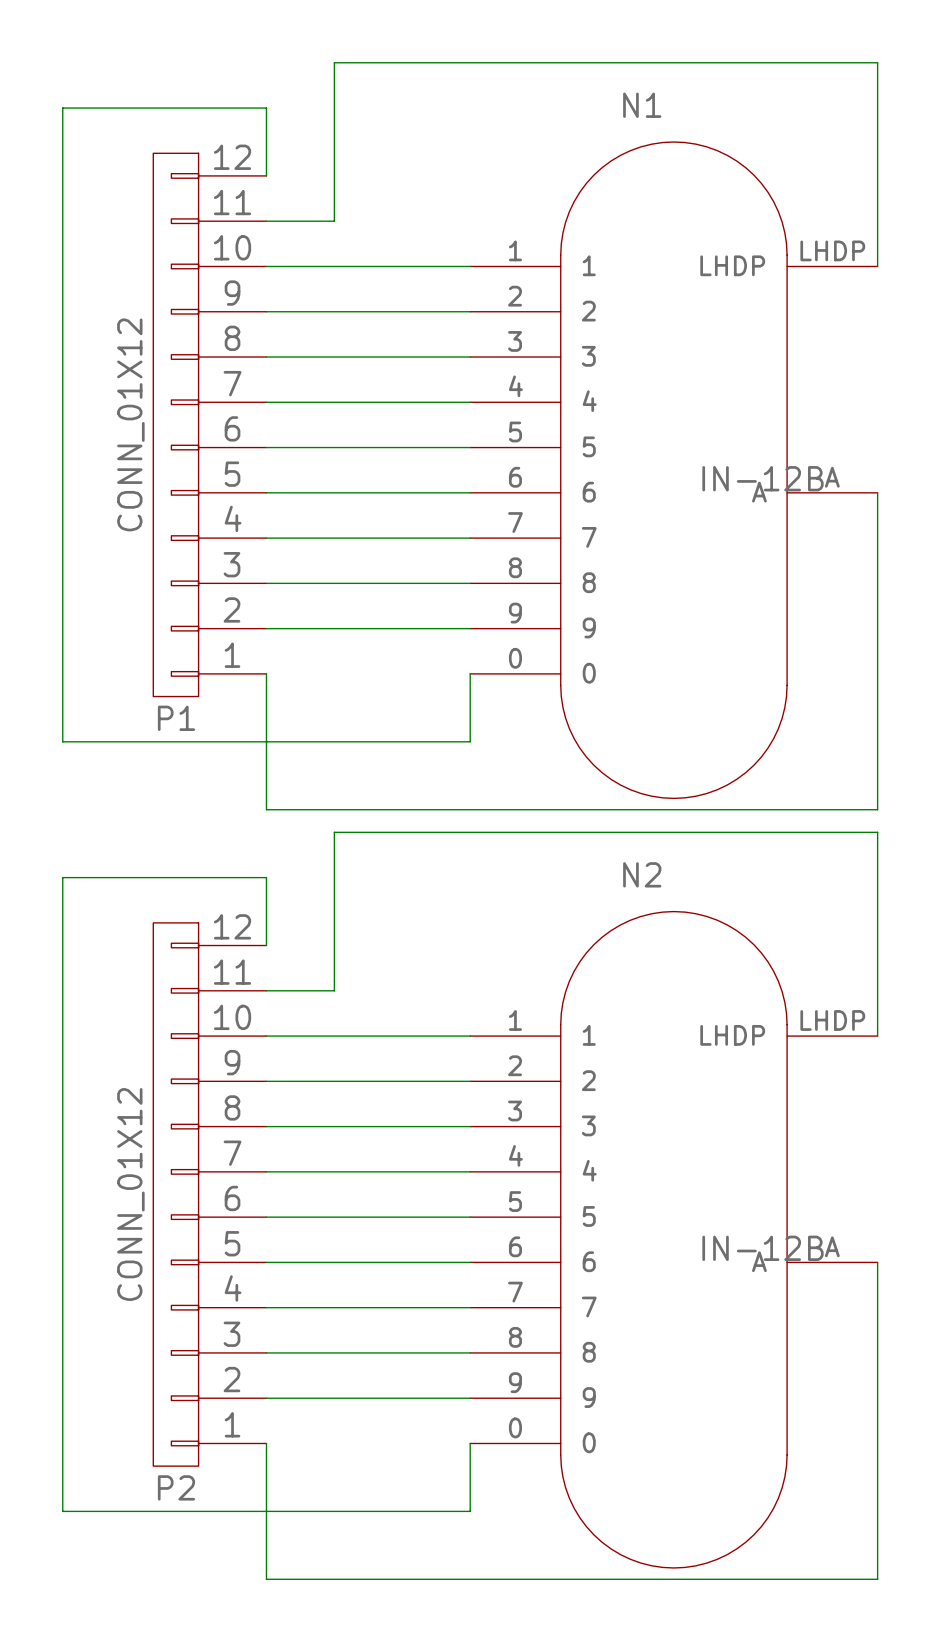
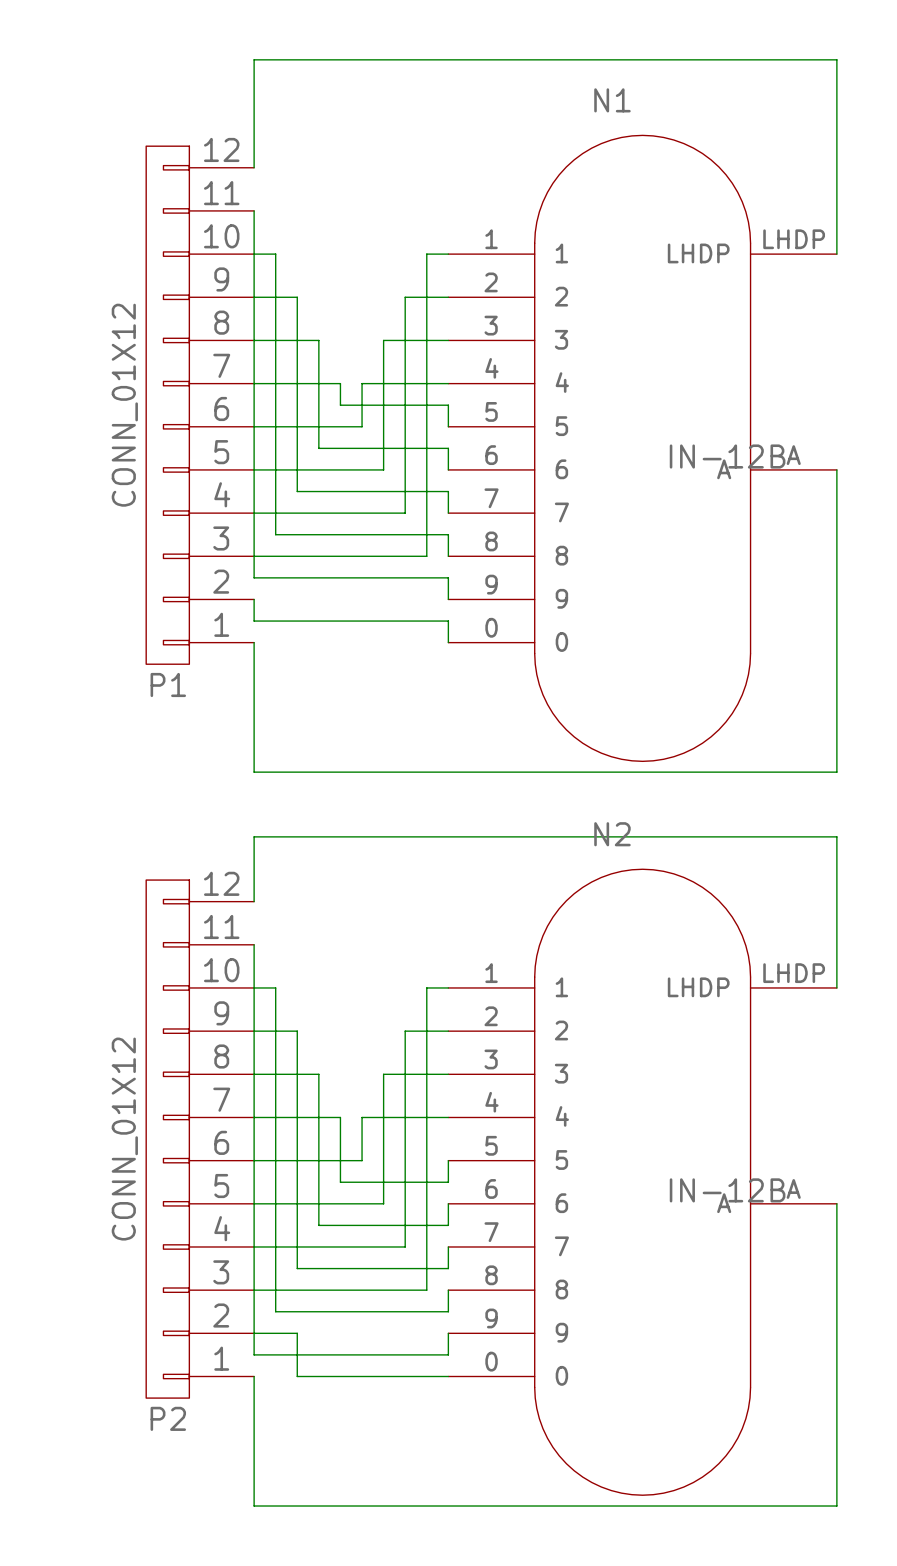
wire: (334, 62) (334, 221) (266, 221) -> (318, 59) (254, 59) (254, 103)
wire: (266, 108) (62, 108) (62, 741) (470, 741) (470, 673) -> none
wire: none -> (254, 210) (254, 577) (448, 577) (448, 599)
wire: (289, 266) (447, 266) -> (275, 254) (275, 534) (448, 534) (448, 556)
wire: (311, 311) (424, 311) -> (297, 297) (297, 491) (448, 491) (448, 513)
wire: (334, 357) (402, 357) -> (318, 340) (318, 448) (448, 448) (448, 469)
wire: (357, 402) (379, 402) -> (362, 426) (362, 383)
wire: (379, 447) (470, 447) -> (340, 383) (340, 405) (448, 405) (448, 426)
wire: (402, 492) (470, 492) -> (383, 469) (383, 340)
wire: (424, 538) (470, 538) -> (405, 513) (405, 297)
wire: (447, 583) (470, 583) -> (426, 556) (426, 254)
wire: (266, 628) (470, 628) -> (254, 599) (254, 621) (448, 621) (448, 642)
wire: (266, 877) (62, 877) (62, 1511) (470, 1511) (470, 1443) -> none
wire: (877, 877) (877, 832) (334, 832) (334, 990) (266, 990) -> (836, 836) (254, 836)
wire: none -> (254, 944) (254, 1354) (448, 1354) (448, 1333)
wire: (289, 1036) (447, 1036) -> (275, 987) (275, 1311) (448, 1311) (448, 1290)
wire: (311, 1081) (424, 1081) -> (297, 1031) (297, 1268) (448, 1268) (448, 1246)
wire: (334, 1126) (402, 1126) -> (318, 1074) (318, 1225) (448, 1225) (448, 1203)
wire: (357, 1171) (379, 1171) -> (362, 1160) (362, 1117)
wire: (379, 1217) (470, 1217) -> (340, 1117) (340, 1182) (448, 1182) (448, 1160)
wire: (402, 1262) (470, 1262) -> (383, 1203) (383, 1074)
wire: (424, 1307) (470, 1307) -> (405, 1246) (405, 1031)
wire: (447, 1352) (470, 1352) -> (426, 1290) (426, 987)
wire: (311, 1398) (470, 1398) -> (297, 1333) (297, 1376) (448, 1376)

